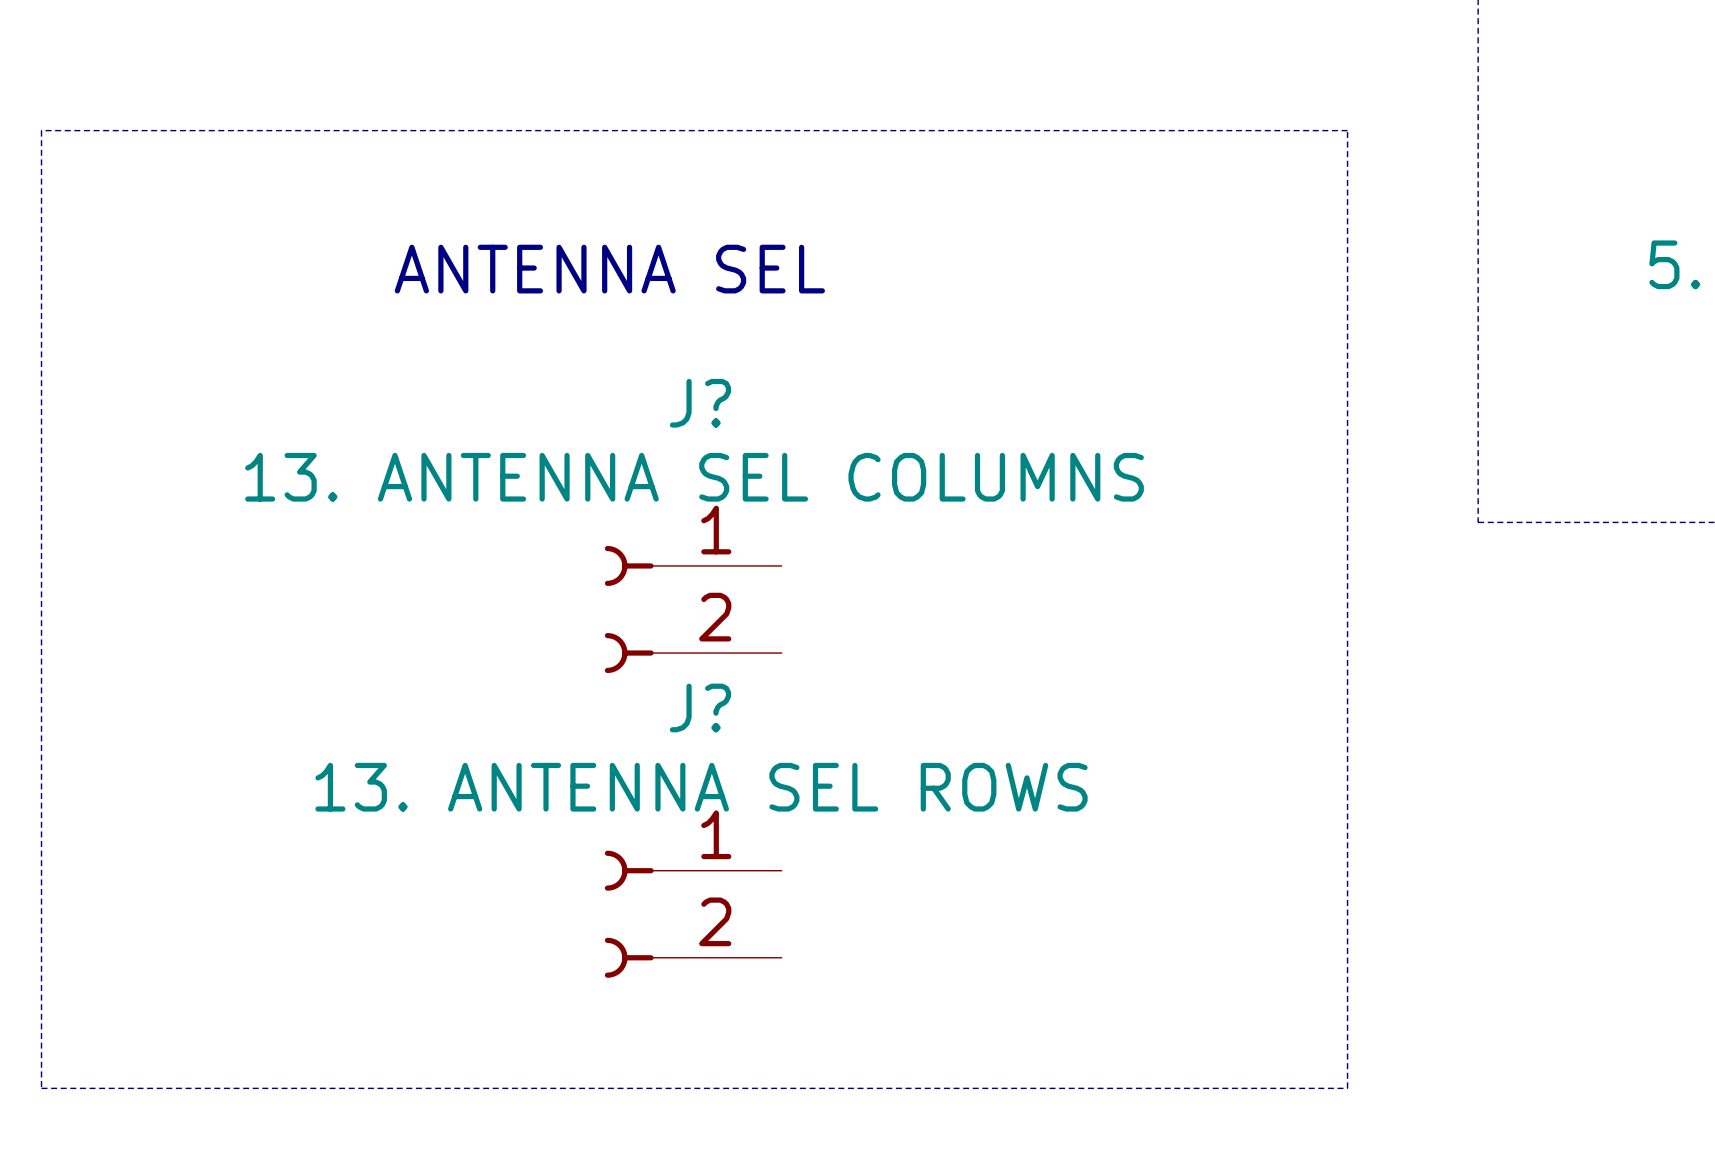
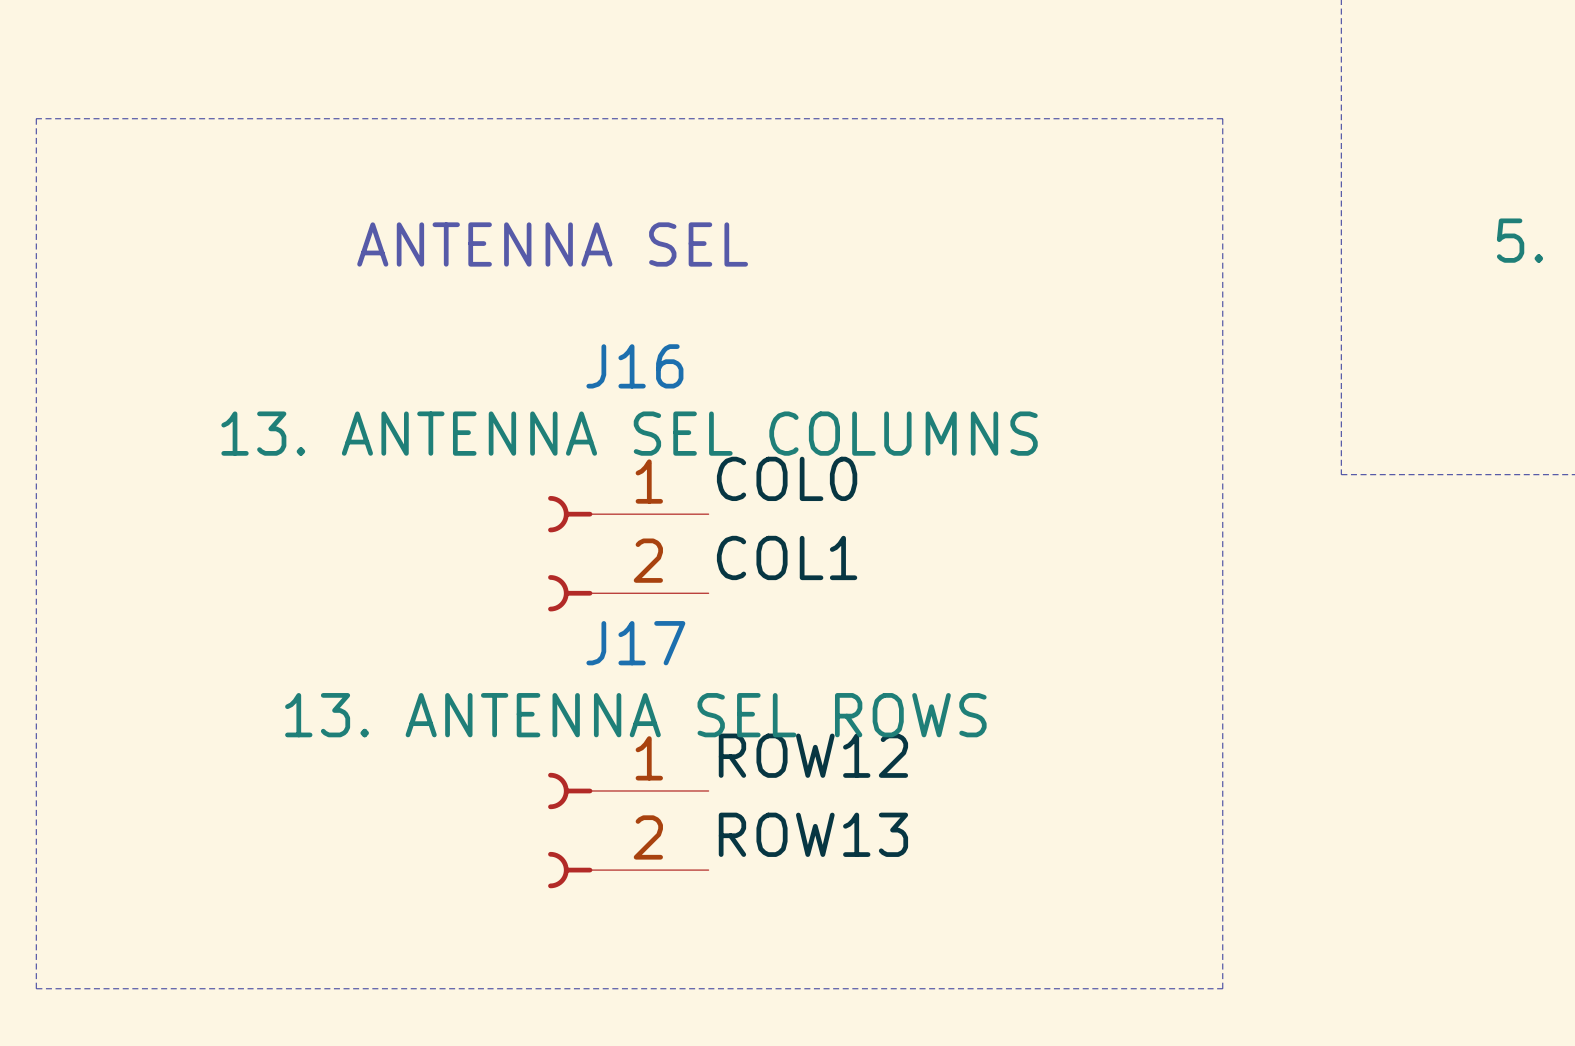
J? name: J? (700, 403) -> J16 (634, 366)
label: none -> COL0 (787, 478)
label: none -> COL1 (787, 557)
J? name: J? (700, 707) -> J17 (635, 643)
label: none -> ROW12 (813, 755)
label: none -> ROW13 (813, 834)

